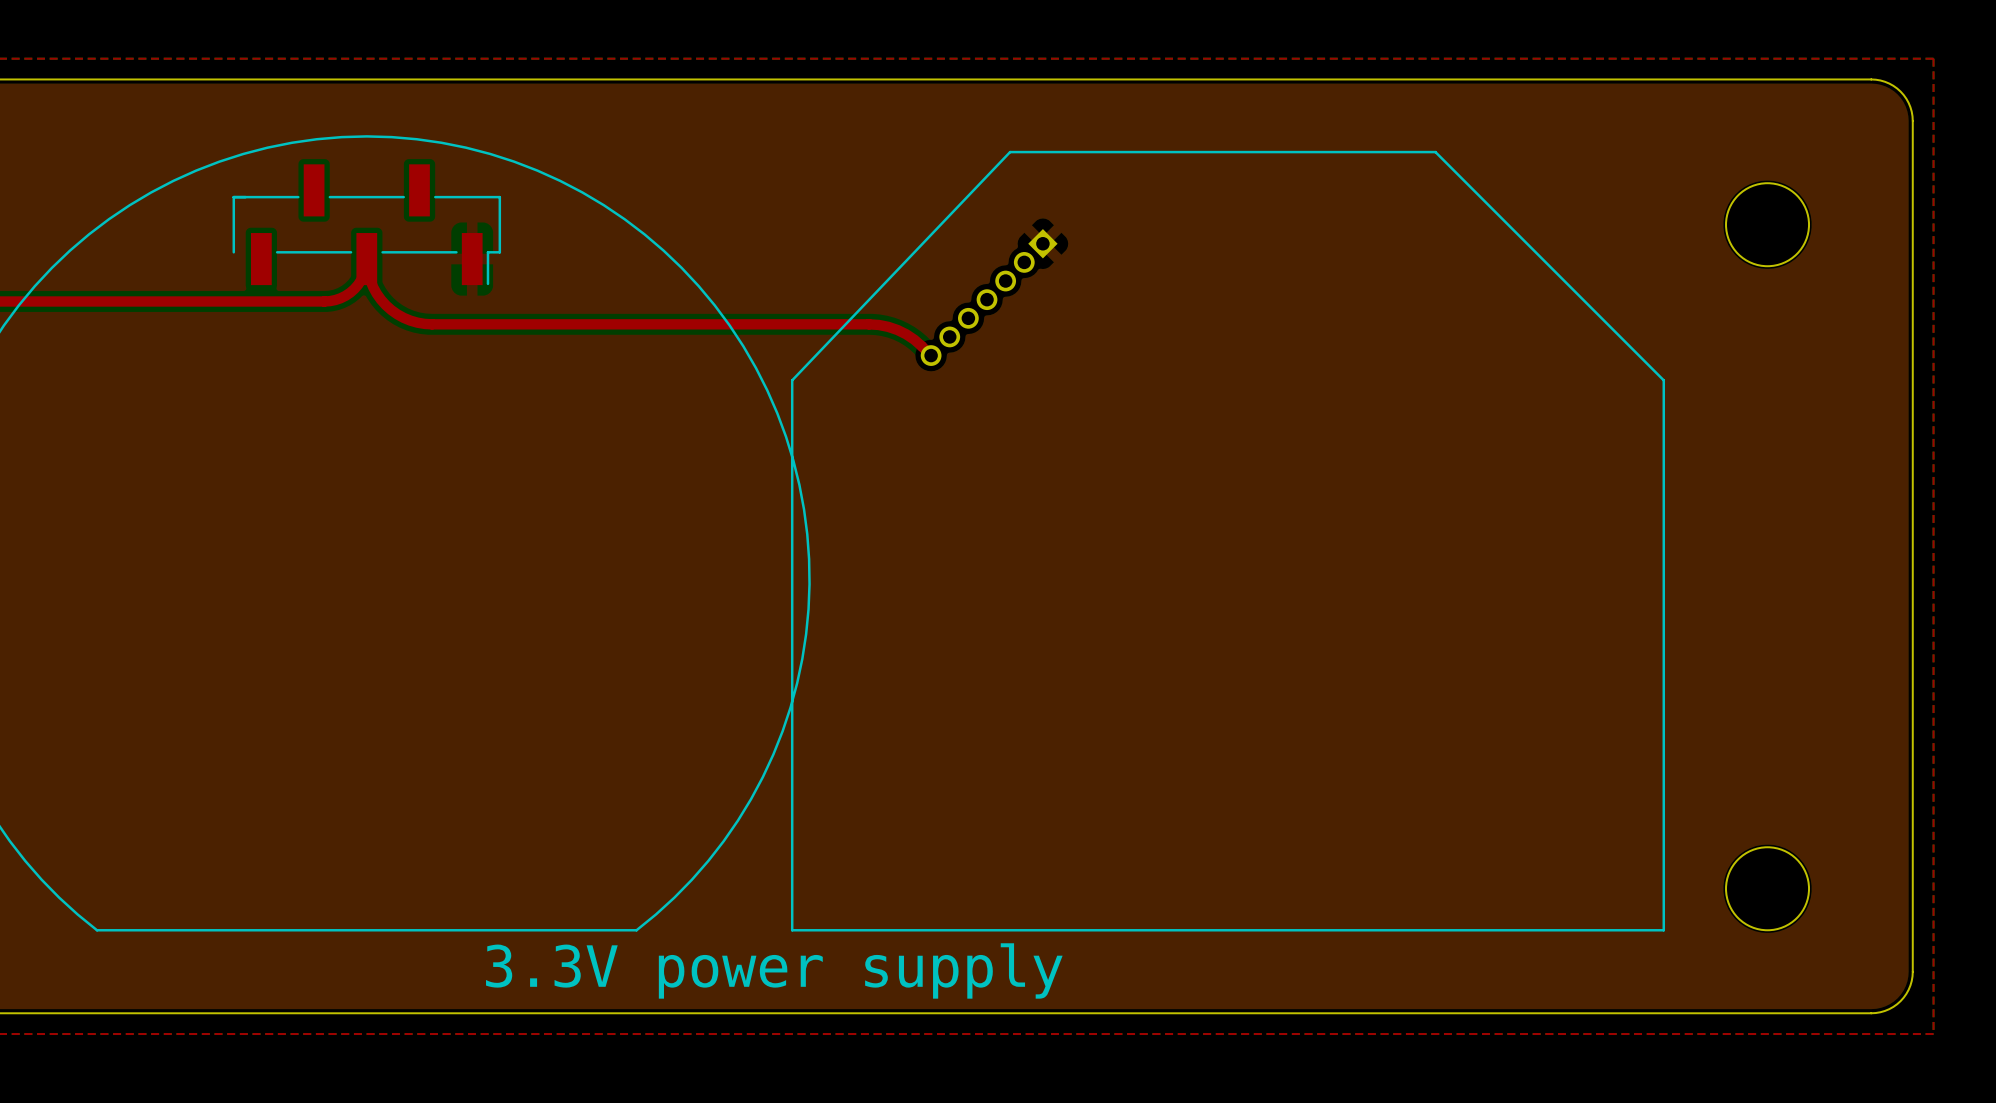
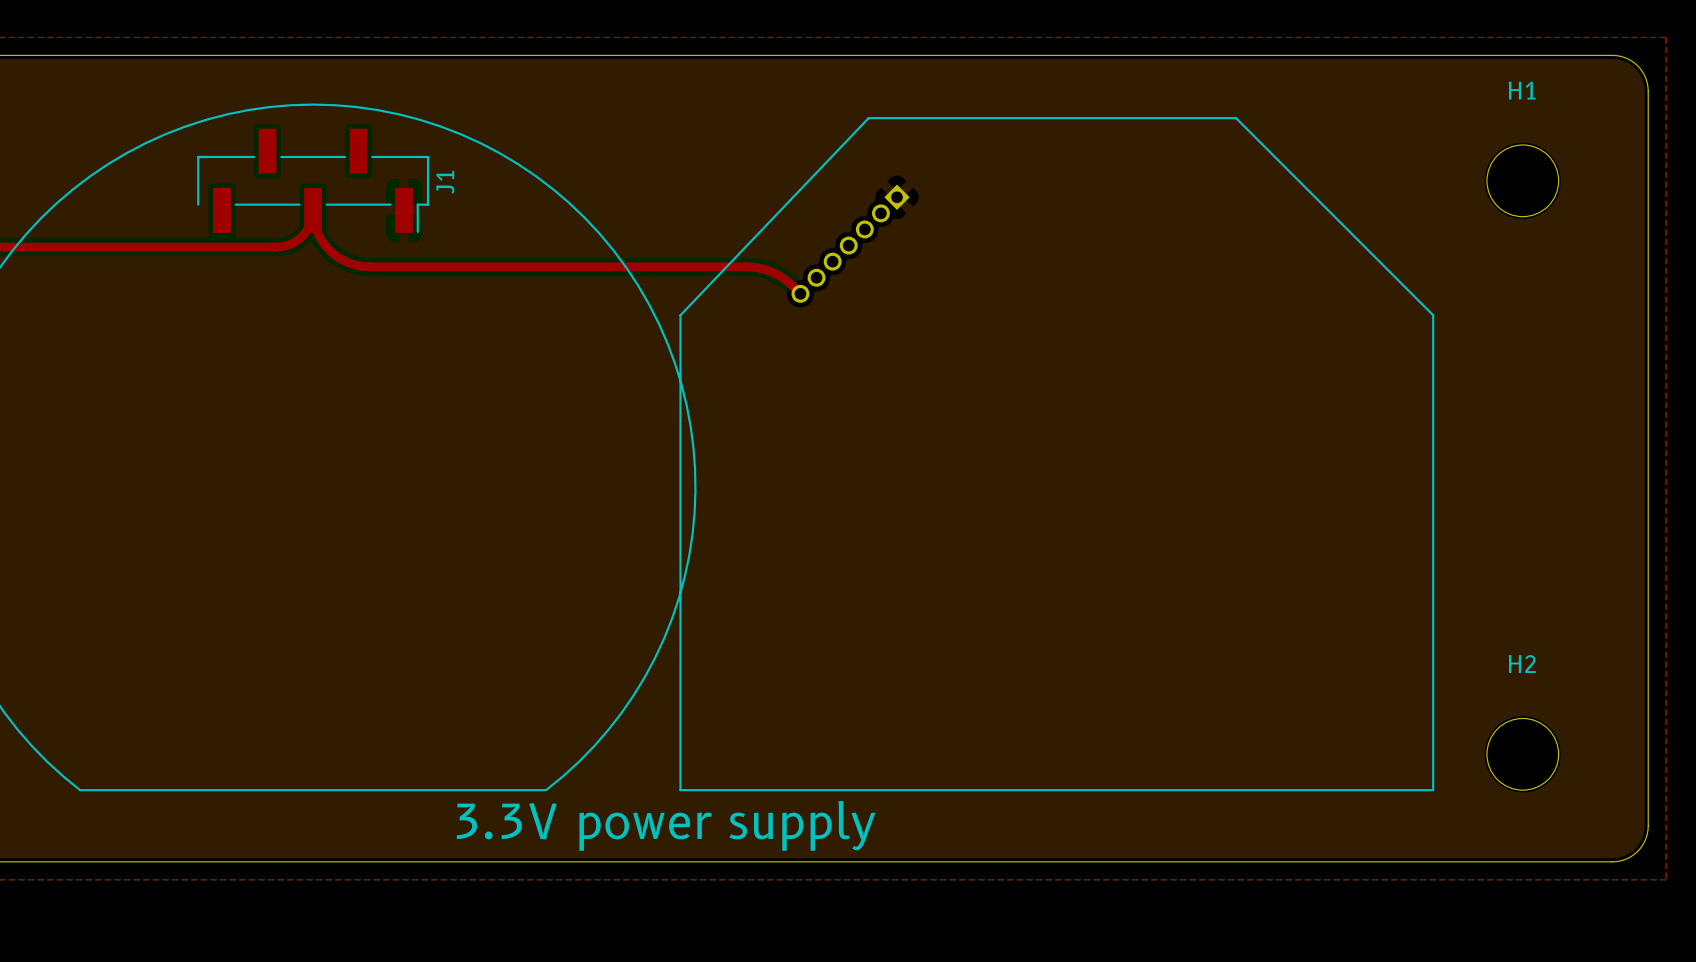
H1 name: none -> H1 (1522, 90)
J1 name: none -> J1 (445, 182)
H2 name: none -> H2 (1522, 664)

